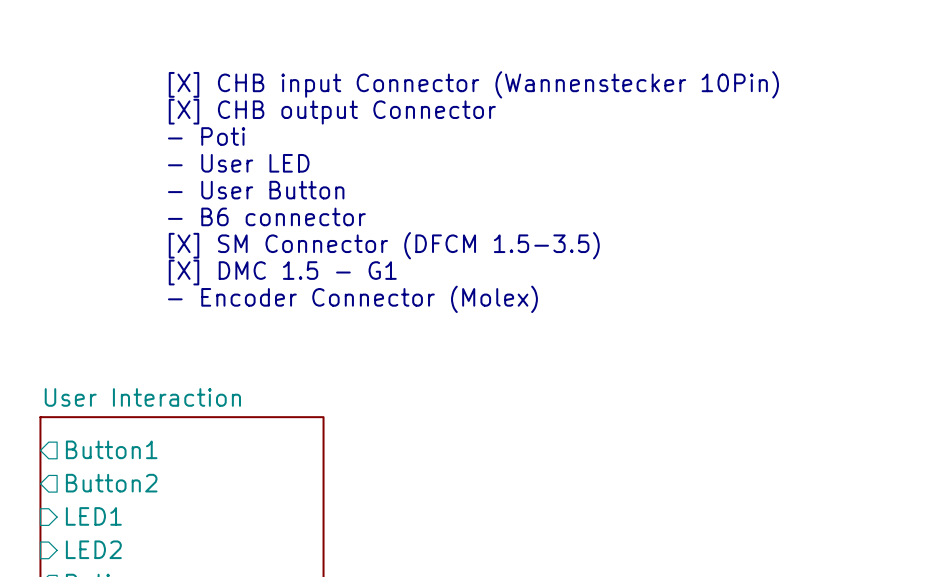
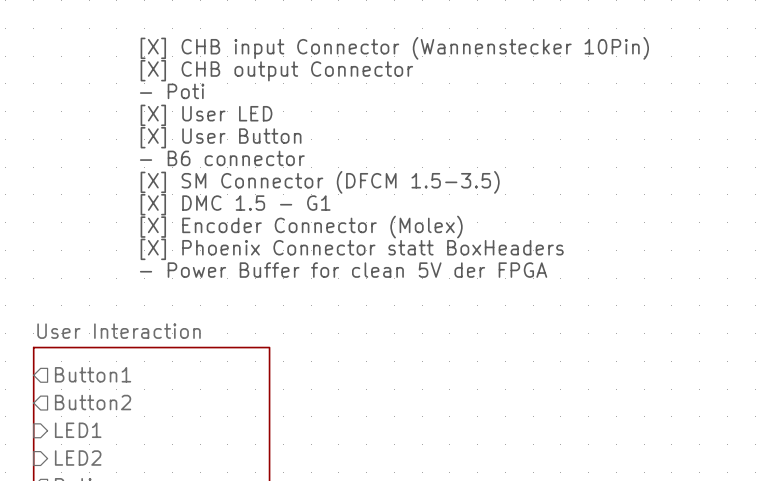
text: none -> [X] CHB input Connector (Wannenstecker 10Pin) (394, 48)
text: [X] CHB input Connector (Wannenstecker 10Pin) (473, 84) -> [X] CHB output Connector (276, 70)
text: [X] CHB output Connector (332, 111) -> - Poti (172, 91)
text: - Poti (206, 136) -> [X] User LED (206, 115)
text: - User LED (238, 163) -> [X] User Button (221, 137)
text: - User Button (256, 190) -> - B6 connector (222, 158)
text: - B6 connector (266, 216) -> [X] SM Connector (DFCM 1.5-3.5) (320, 182)
text: [X] SM Connector (DFCM 1.5-3.5) (384, 245) -> [X] DMC 1.5 - G1 (235, 204)
text: [X] DMC 1.5 - G1 (282, 272) -> [X] Encoder Connector (Molex) (301, 227)
text: - Encoder Connector (Molex) (352, 299) -> [X] Phoenix Connector statt BoxHeaders (352, 249)
text: none -> - Power Buffer for clean 5V der FPGA (343, 270)

